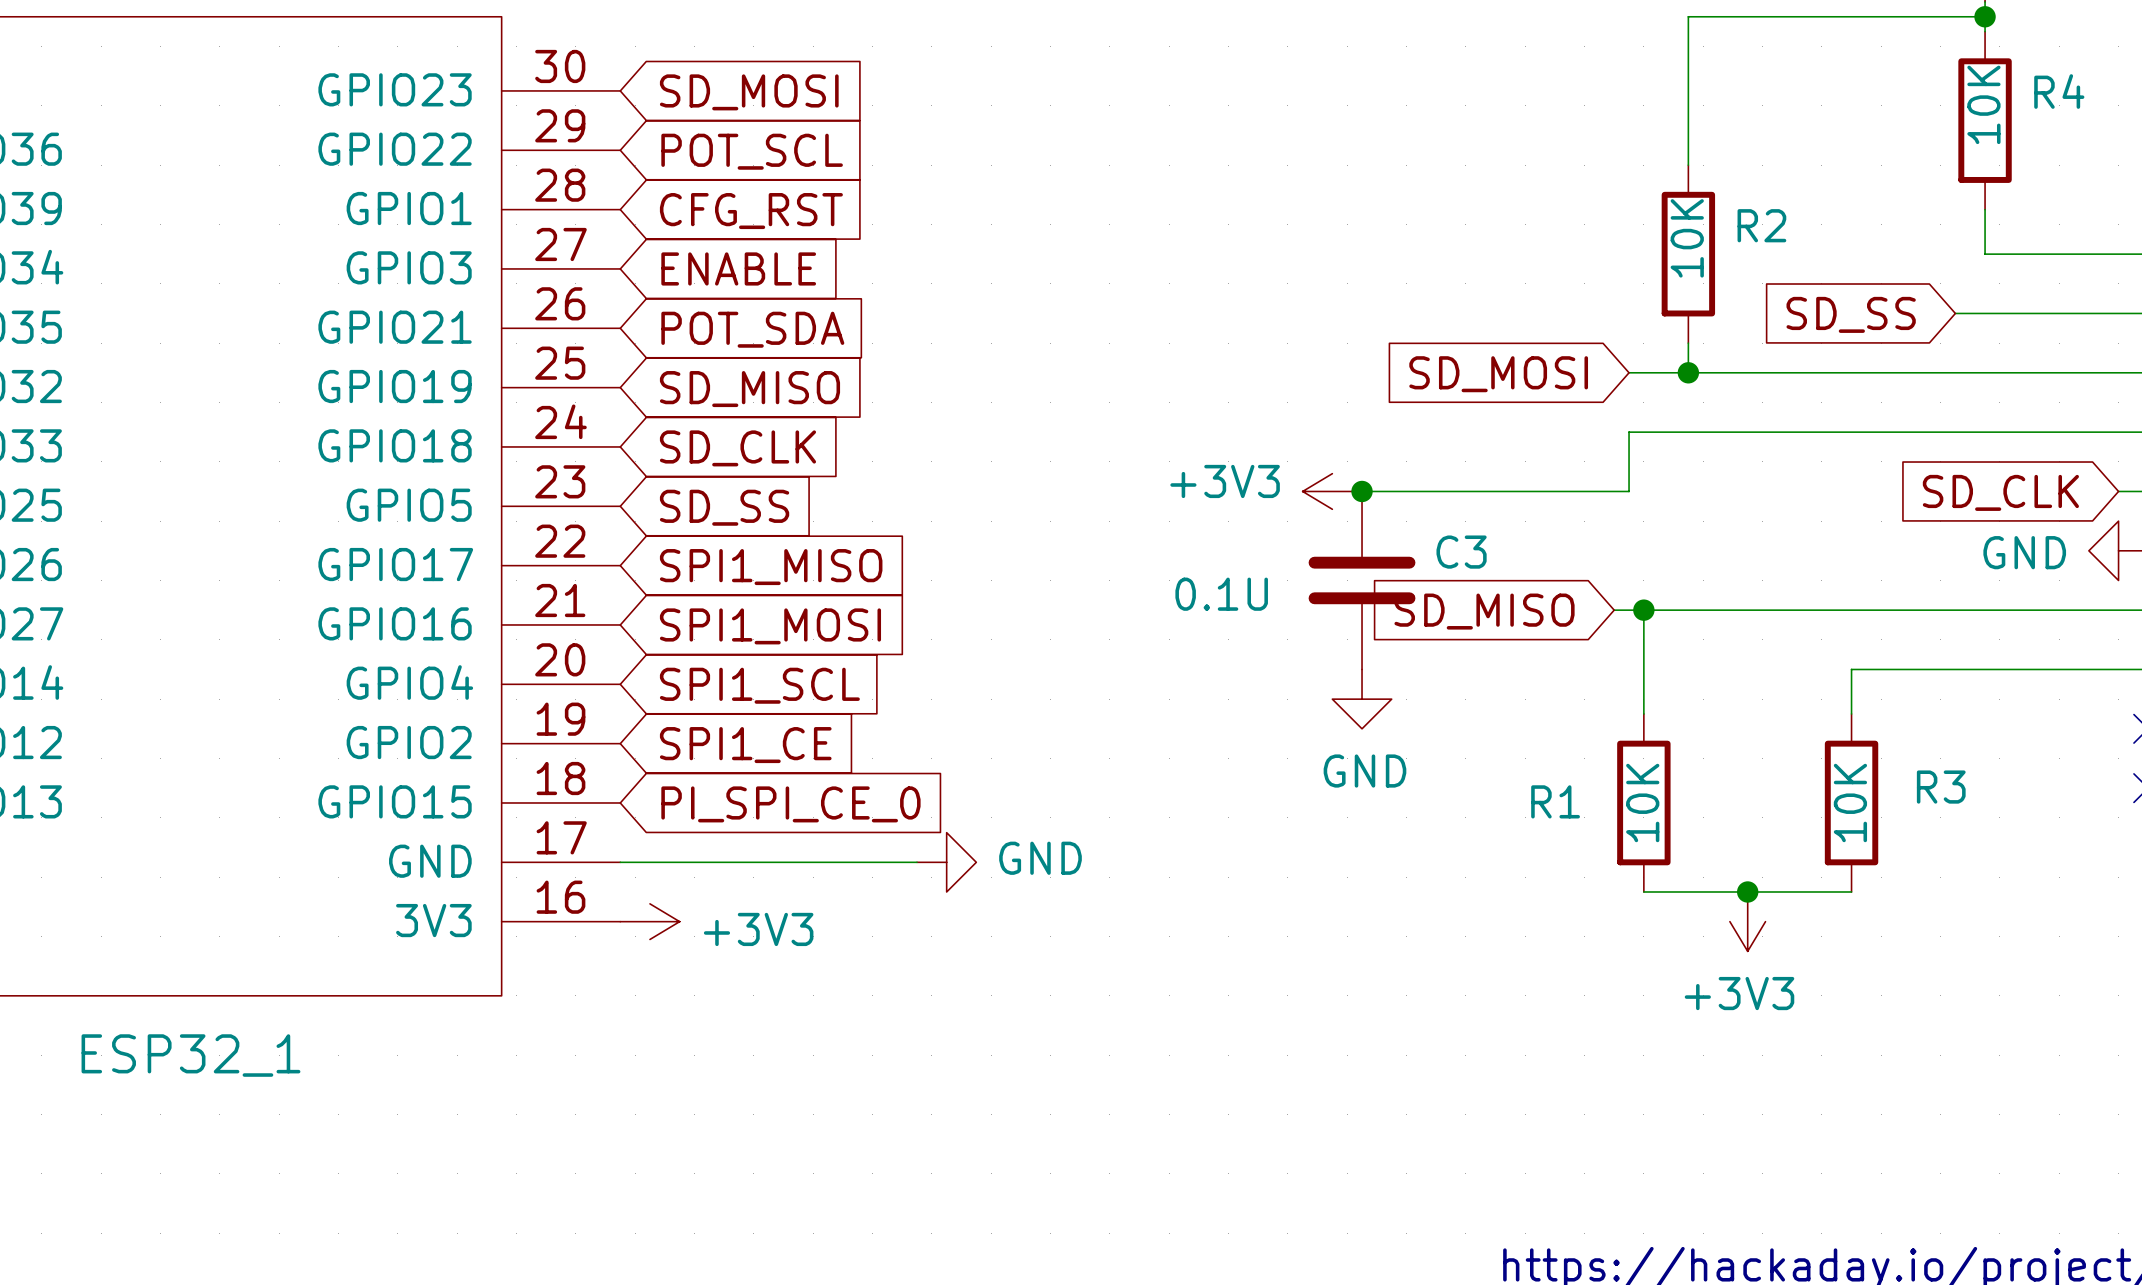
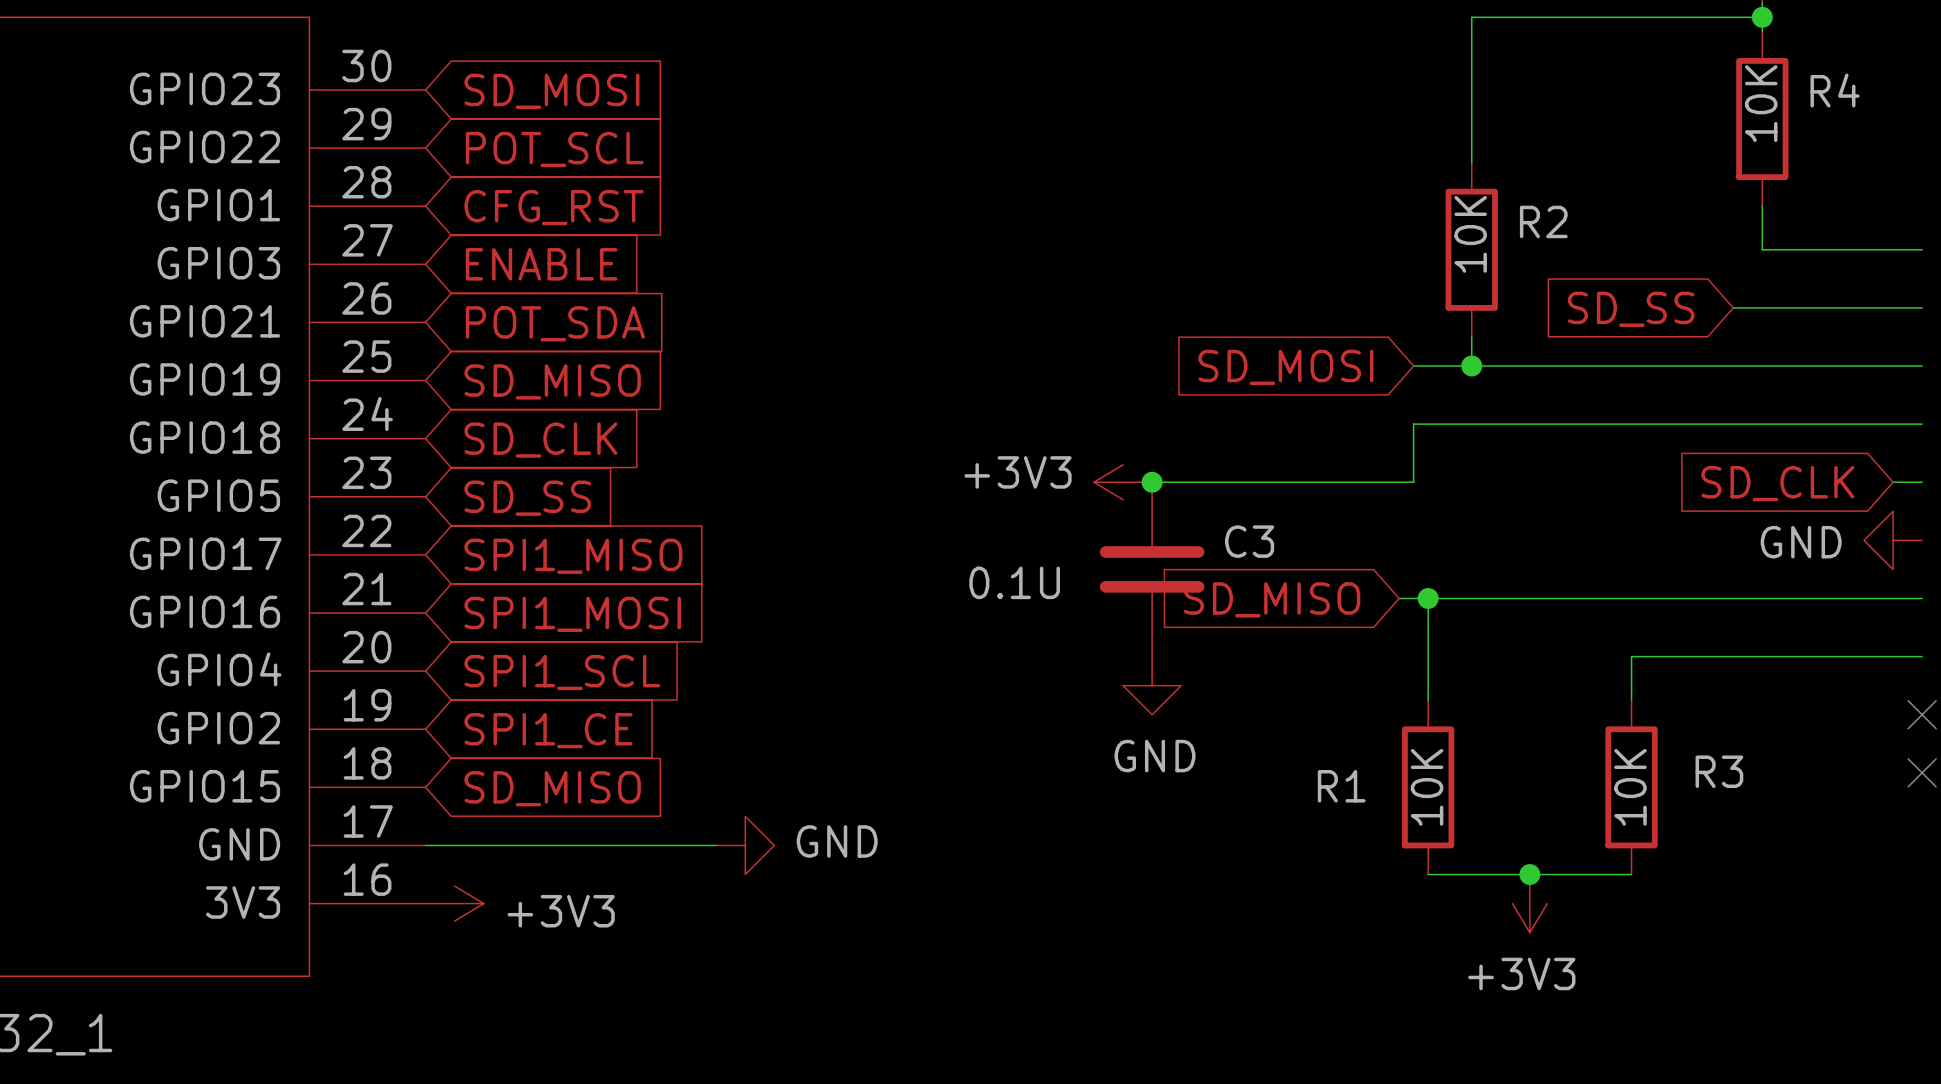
global label: PI_SPI_CE_0 (790, 804) -> SD_MISO (552, 788)

